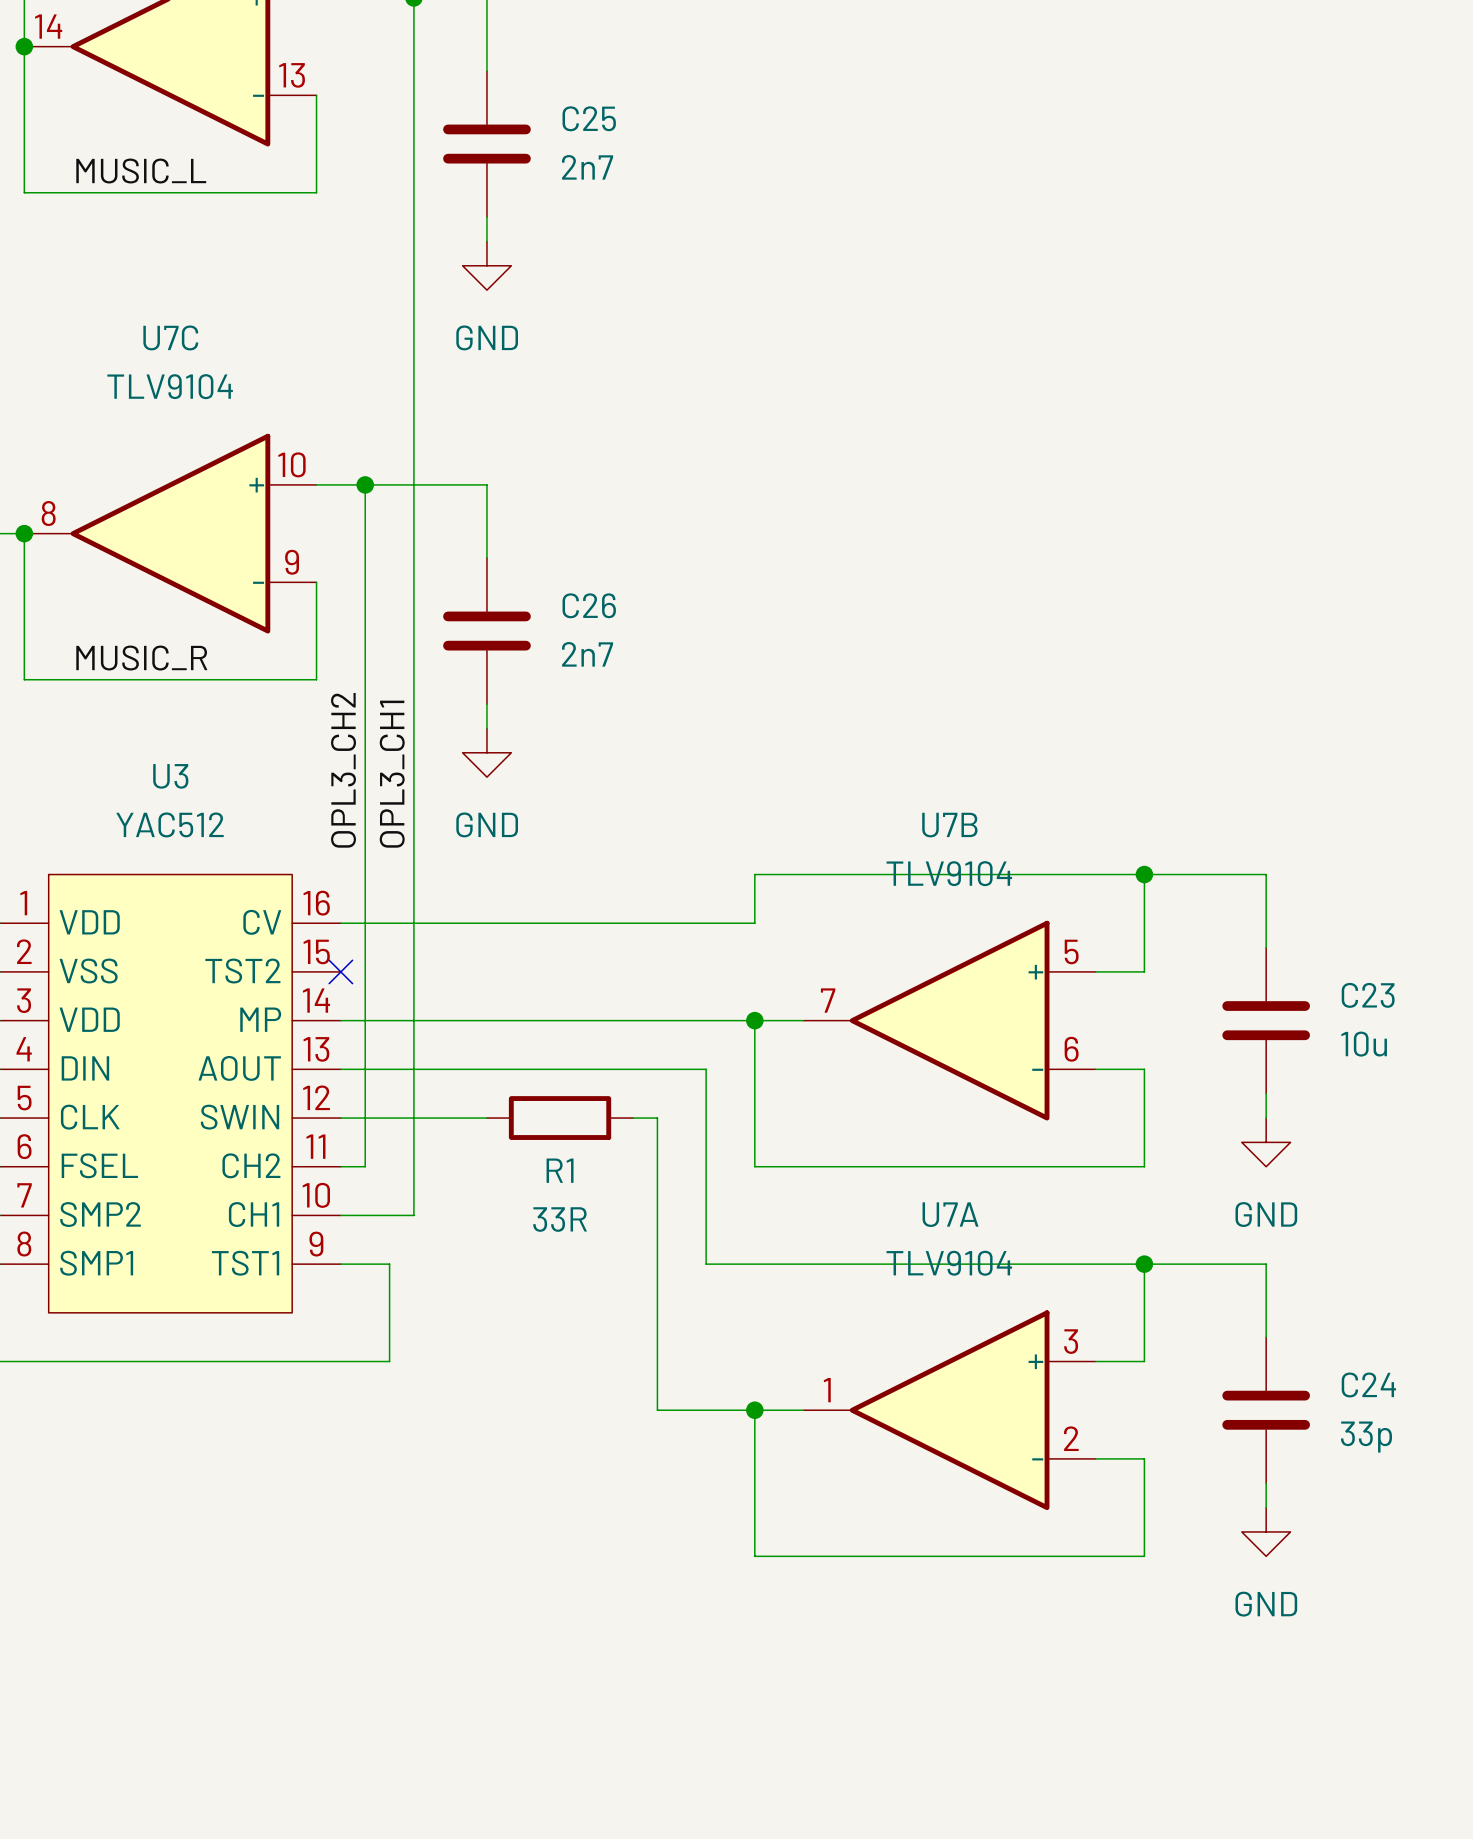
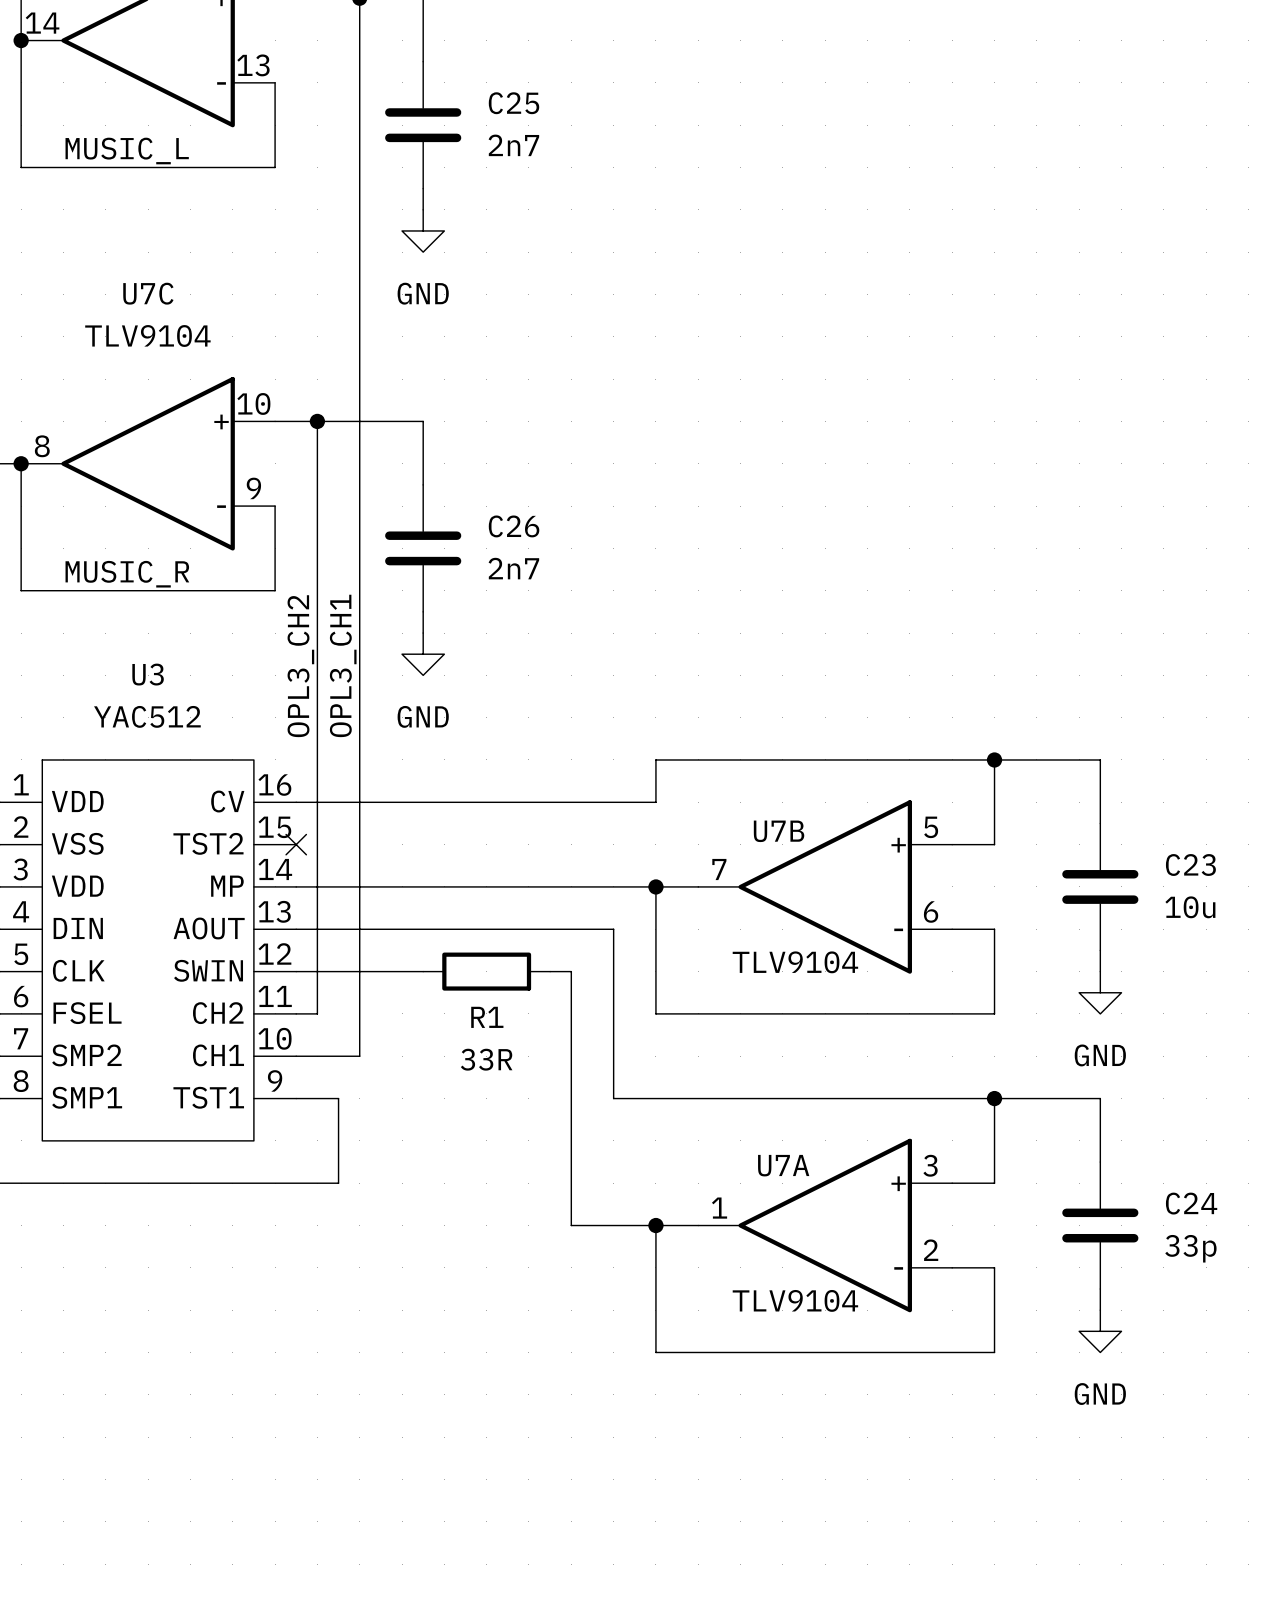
U7B name position: U7B (949, 825) -> U7B (779, 831)
U7B value position: TLV9104 (949, 873) -> TLV9104 (795, 962)
U7A name position: U7A (950, 1214) -> U7A (783, 1165)
U7A value position: TLV9104 (949, 1263) -> TLV9104 (795, 1300)

